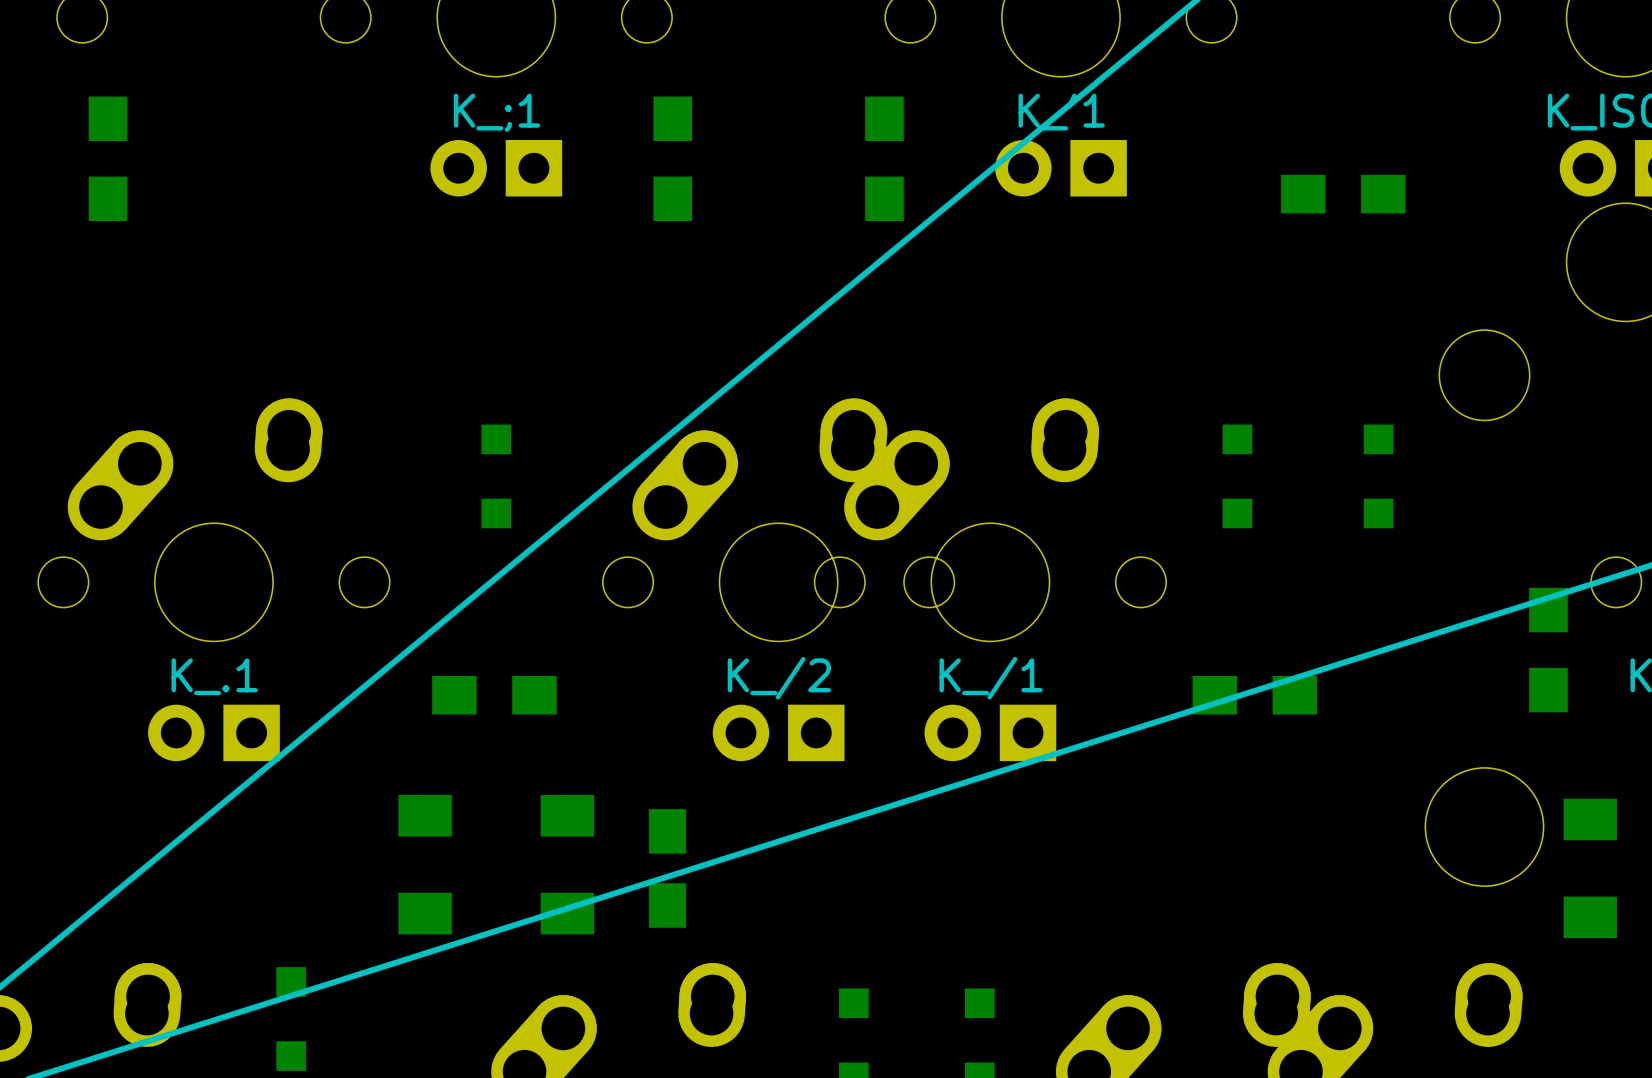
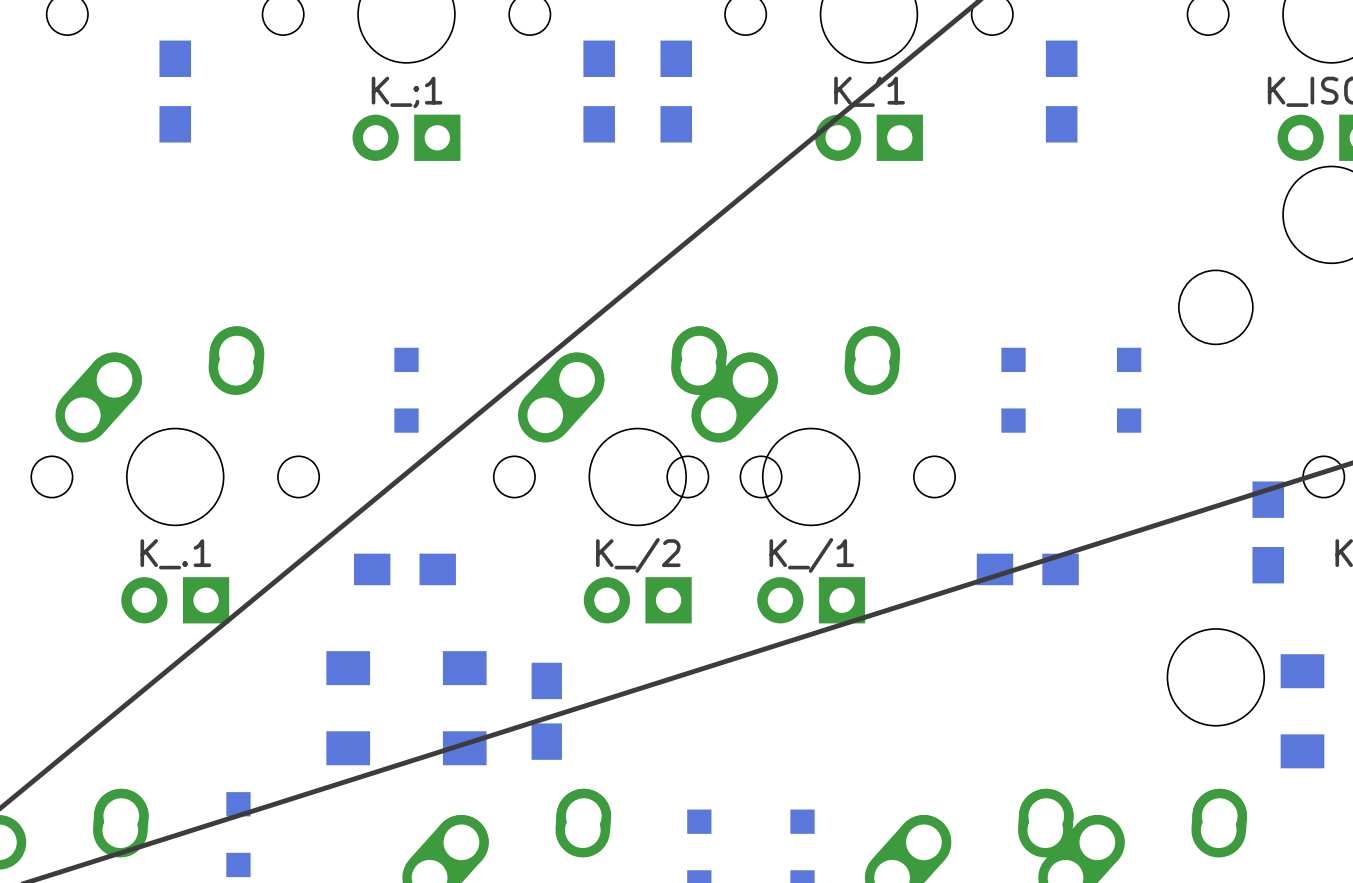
part position: (108, 158) -> (175, 91)
part position: (672, 158) -> (599, 91)
part position: (884, 158) -> (676, 91)
part rotation: 0° (1343, 194) -> 90° clockwise (1061, 91)
part position: (1343, 194) -> (1061, 91)

